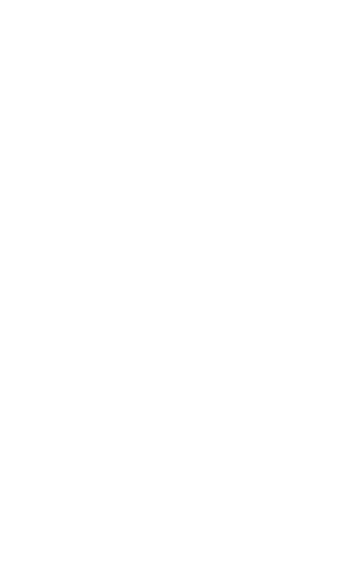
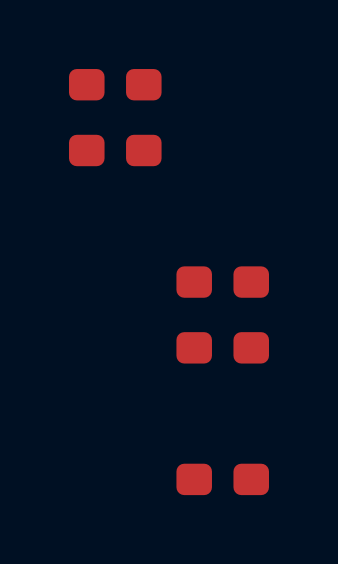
part: none -> (115, 84)
part: none -> (115, 150)
part: none -> (222, 282)
part: none -> (222, 347)
part: none -> (222, 479)

